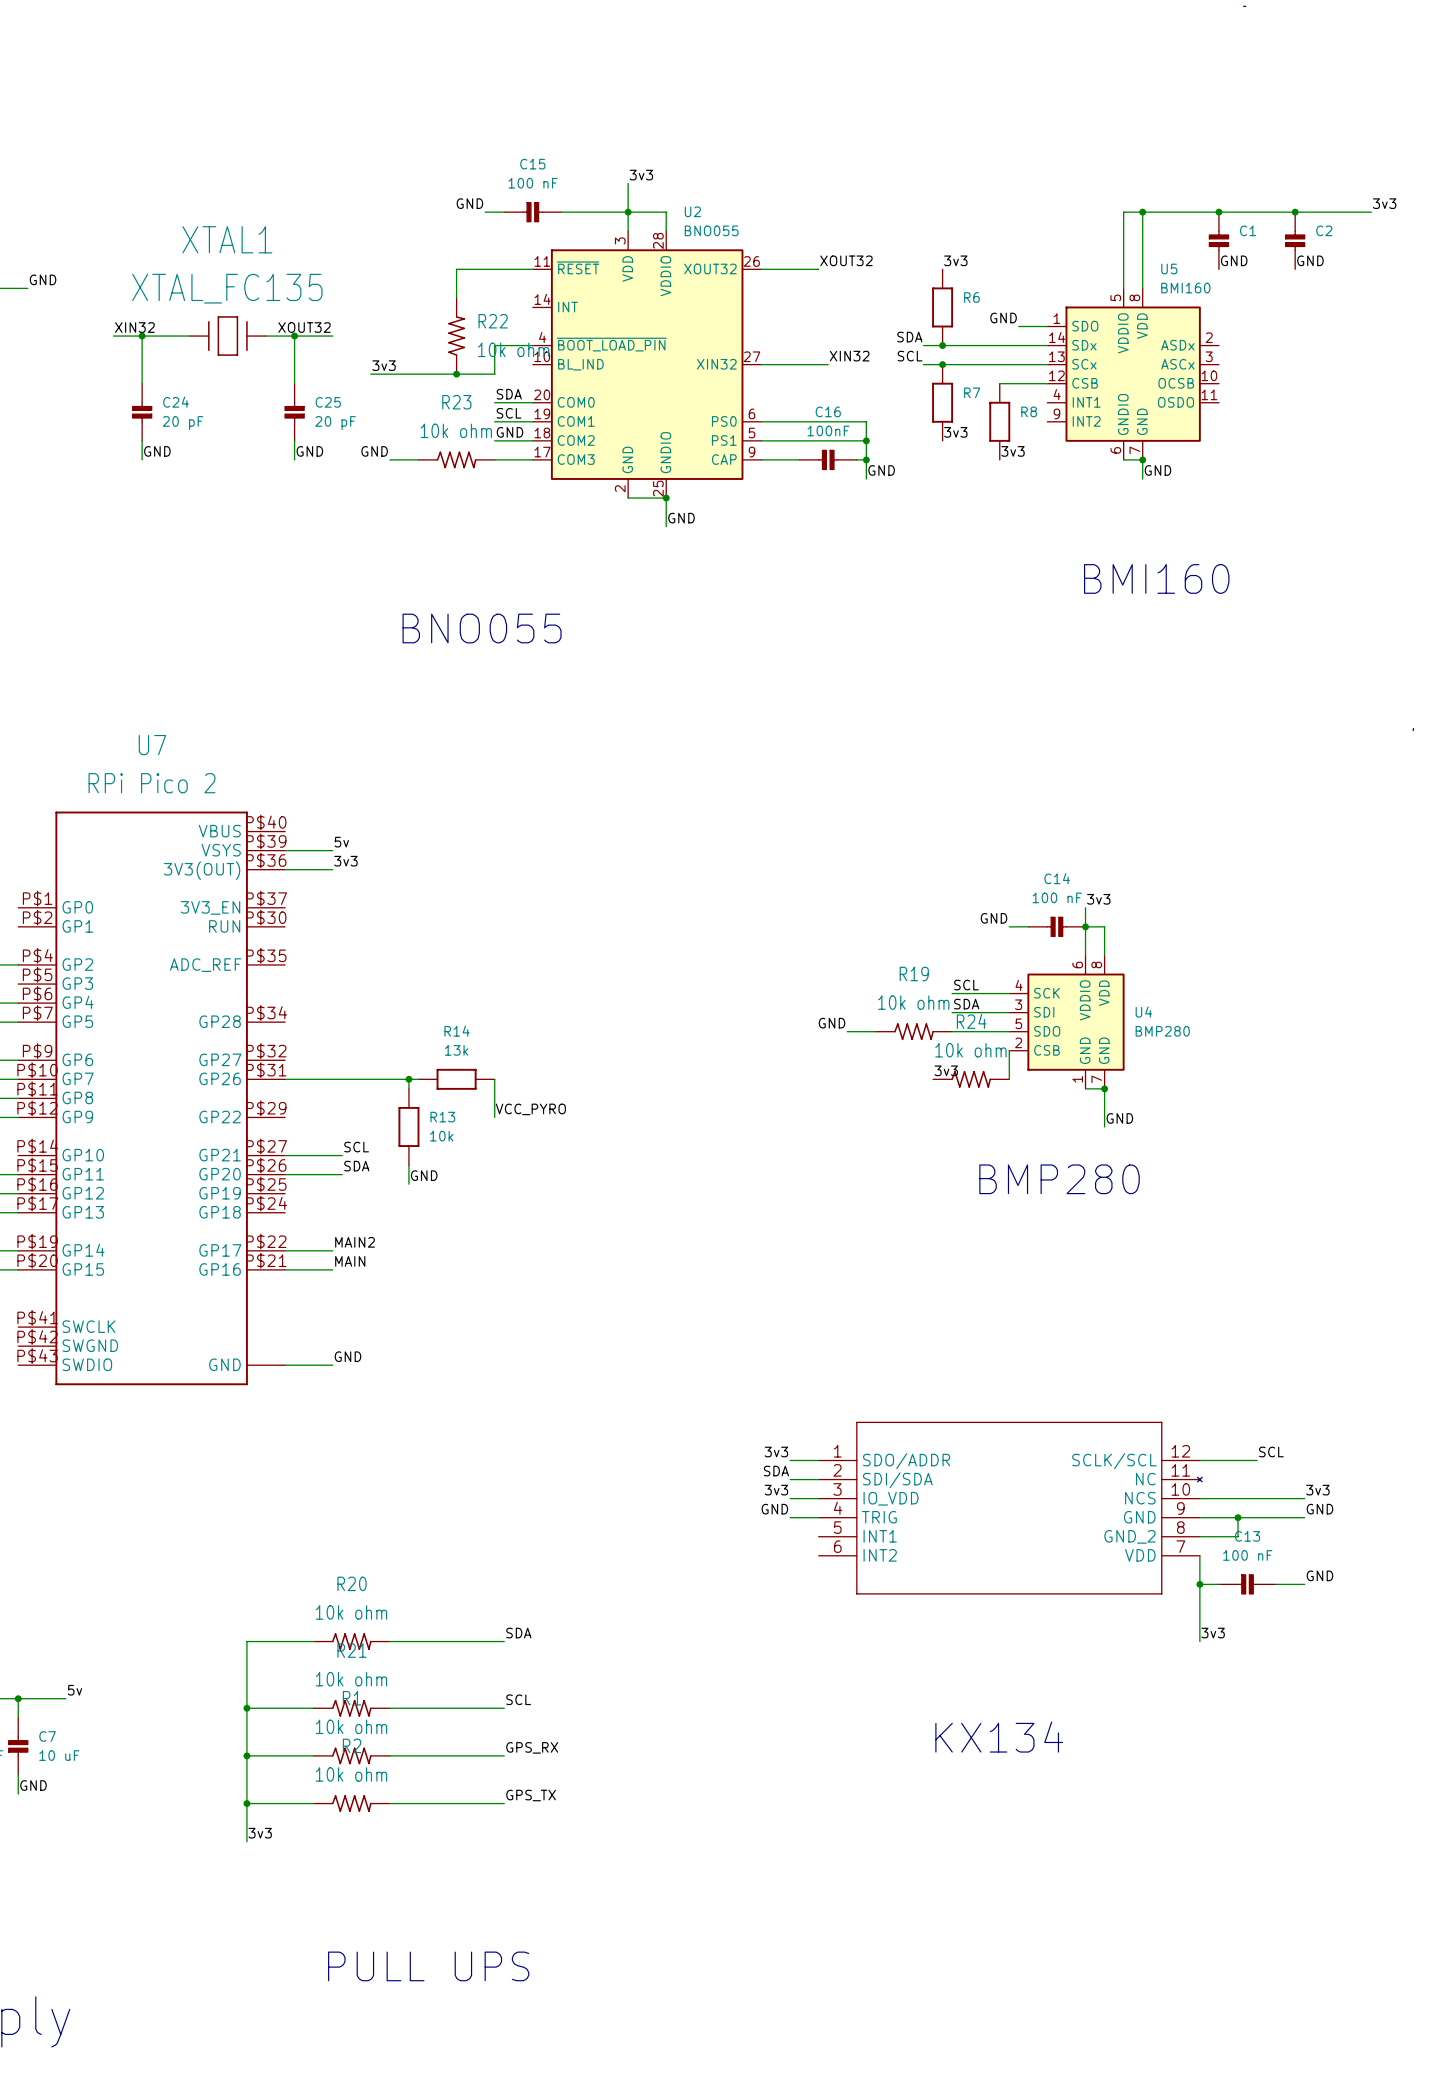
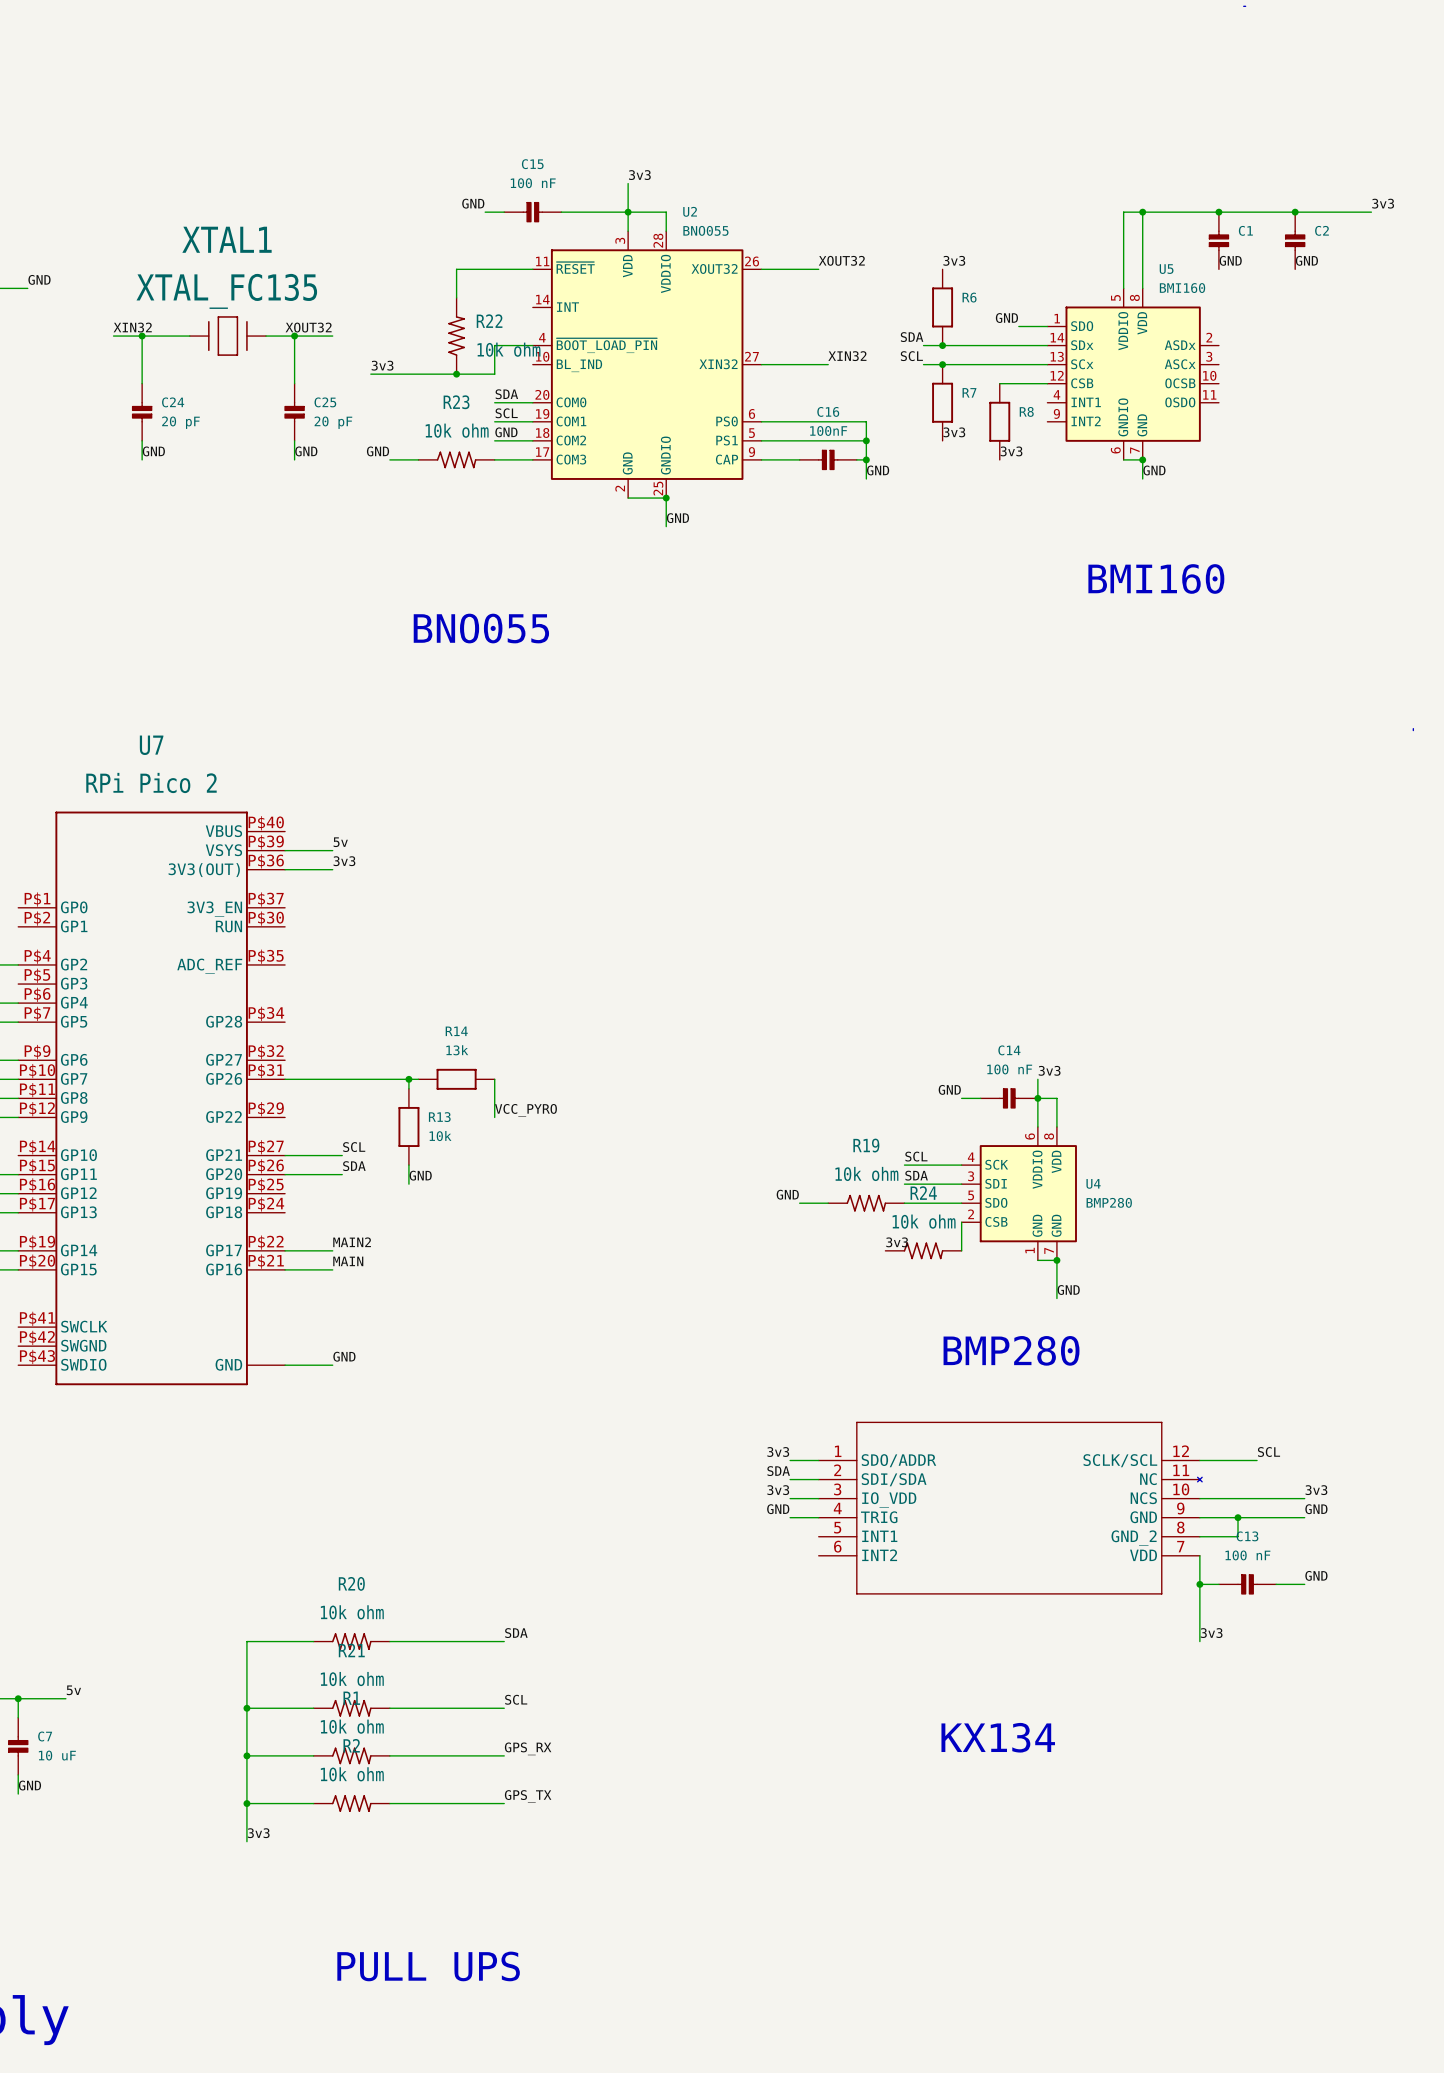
label: 3v3 (1098, 899) -> none
wire: (1085, 907) (1085, 955) -> (1037, 1079) (1037, 1126)
label: GND (994, 918) -> none
wire: (1009, 926) (1028, 926) -> (961, 1098) (980, 1098)
C14 position: (1056, 926) -> (1009, 1098)
wire: (1085, 926) (1104, 926) (1104, 955) -> (1037, 1098) (1056, 1098) (1056, 1126)
junction: (1085, 926) -> none
label position: SCL (966, 985) -> SCL (916, 1156)
wire: (952, 993) (1009, 993) -> (904, 1165) (961, 1165)
label position: SDA (966, 1004) -> SDA (916, 1175)
wire: (952, 1012) (1009, 1012) -> (904, 1184) (961, 1184)
U4 position: (1066, 1022) -> (1019, 1193)
label: GND (832, 1023) -> none
wire: (847, 1031) (875, 1031) -> (799, 1203) (828, 1203)
R19 position: (914, 1031) -> (866, 1203)
wire: (952, 1031) (1009, 1031) -> (904, 1203) (961, 1203)
wire: (1009, 1050) (1009, 1079) -> (961, 1222) (961, 1250)
label: 3v3 (946, 1070) -> none
label: none -> 3v3 (1049, 1070)
R24 position: (971, 1079) -> (923, 1250)
wire: (1085, 1088) (1104, 1088) (1104, 1126) -> (1037, 1260) (1056, 1260) (1056, 1298)
junction: (1104, 1088) -> none
label: none -> GND (949, 1089)
junction: none -> (1037, 1098)
label: GND (1119, 1118) -> none
text position: BMP280 (1059, 1179) -> BMP280 (1011, 1350)
label: none -> GND (787, 1194)
label: none -> 3v3 (897, 1242)
junction: none -> (1056, 1260)
label: none -> GND (1068, 1290)

